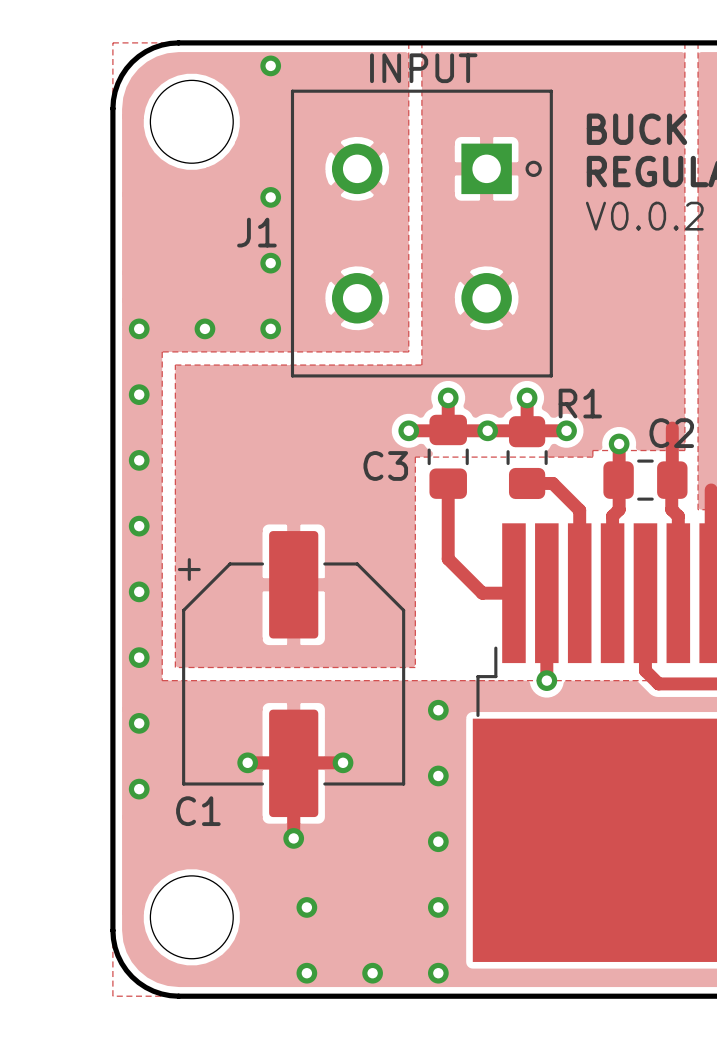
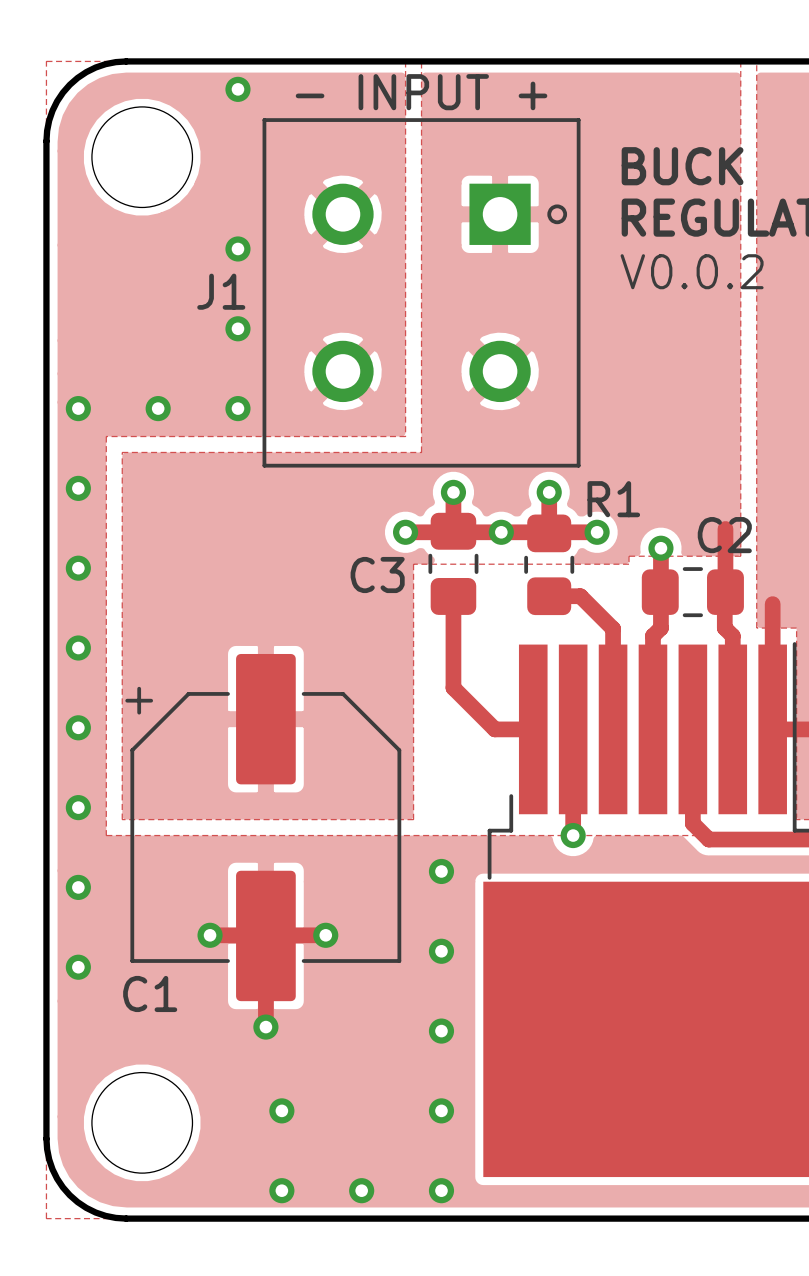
J1 value: INPUT (423, 68) -> - INPUT + (421, 92)

